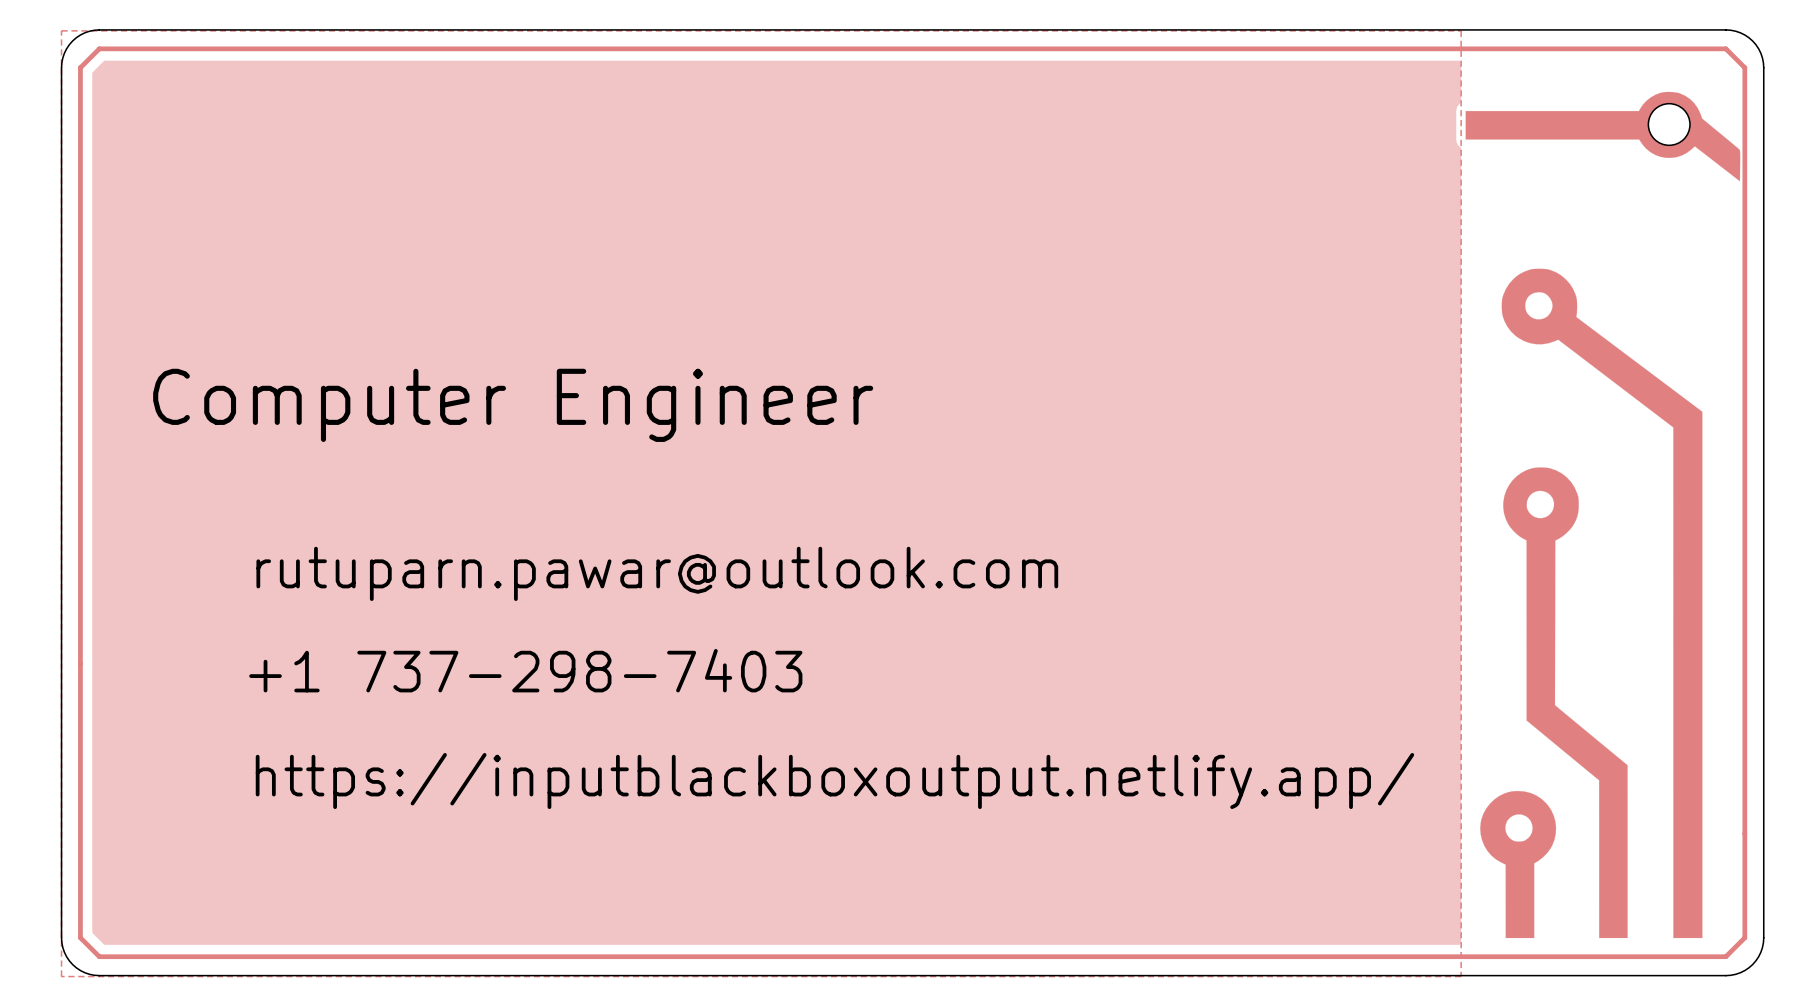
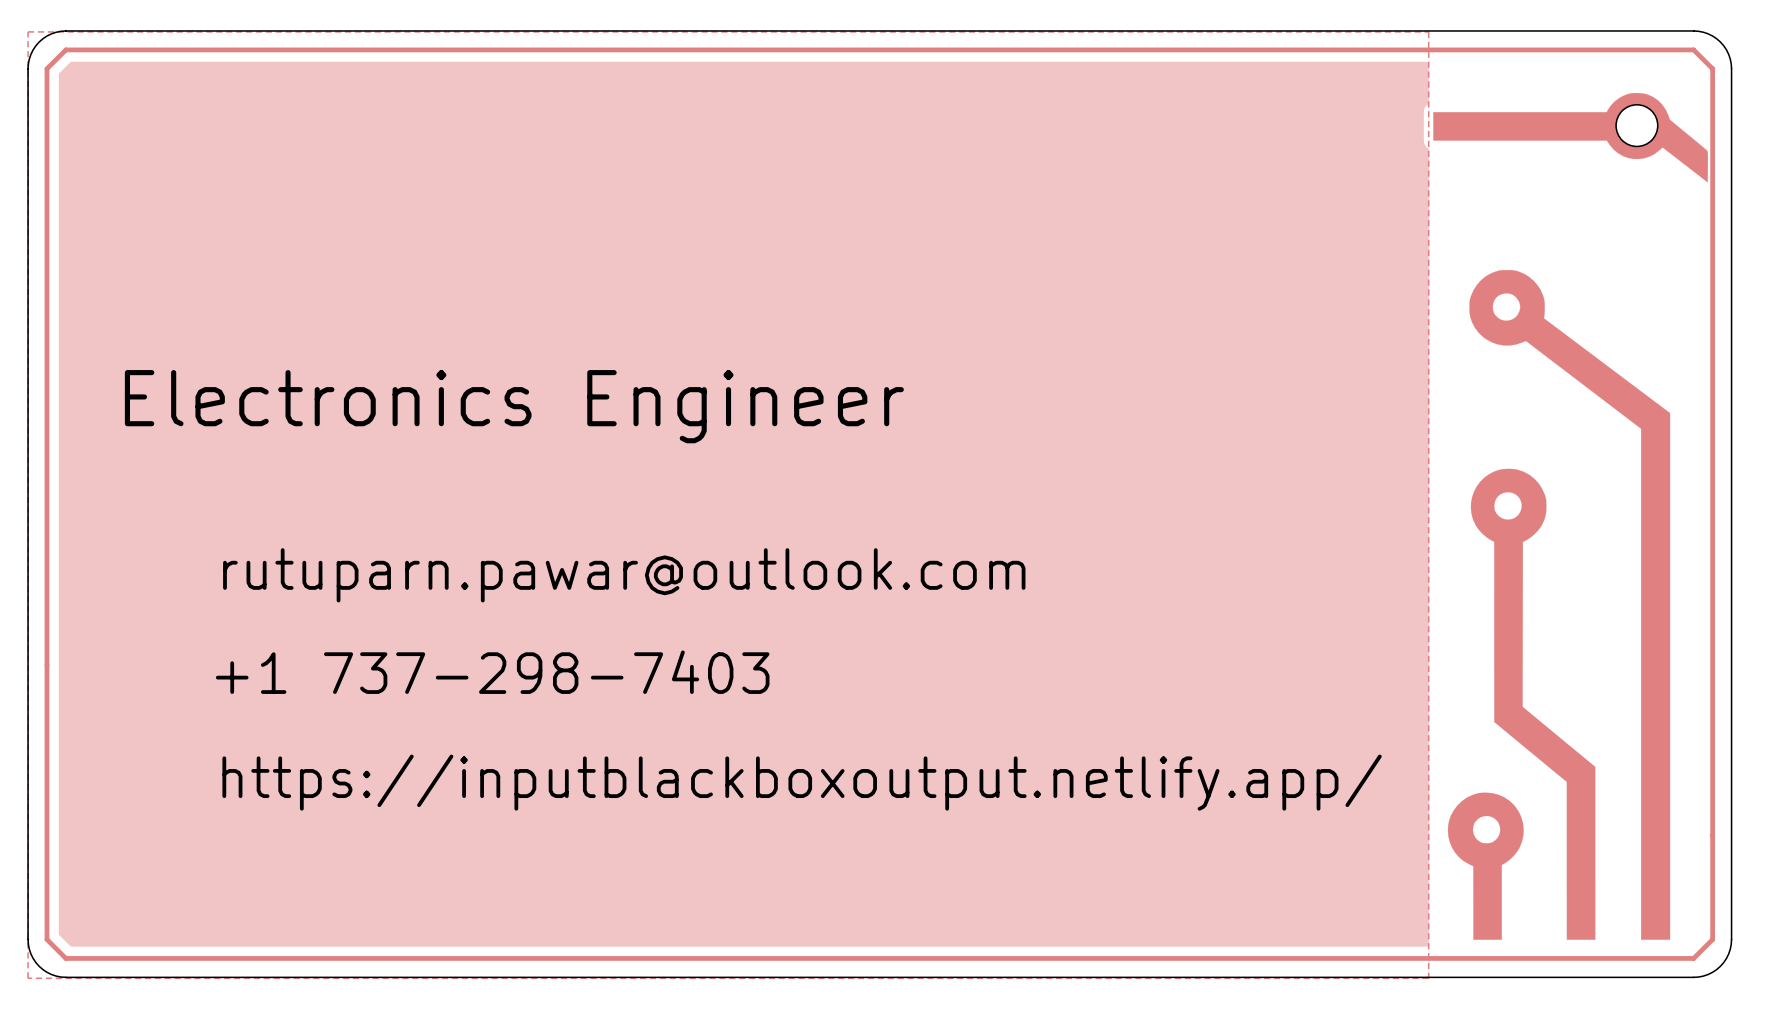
text: Computer Engineer (513, 405) -> none
text: none -> Electronics Engineer (514, 406)

